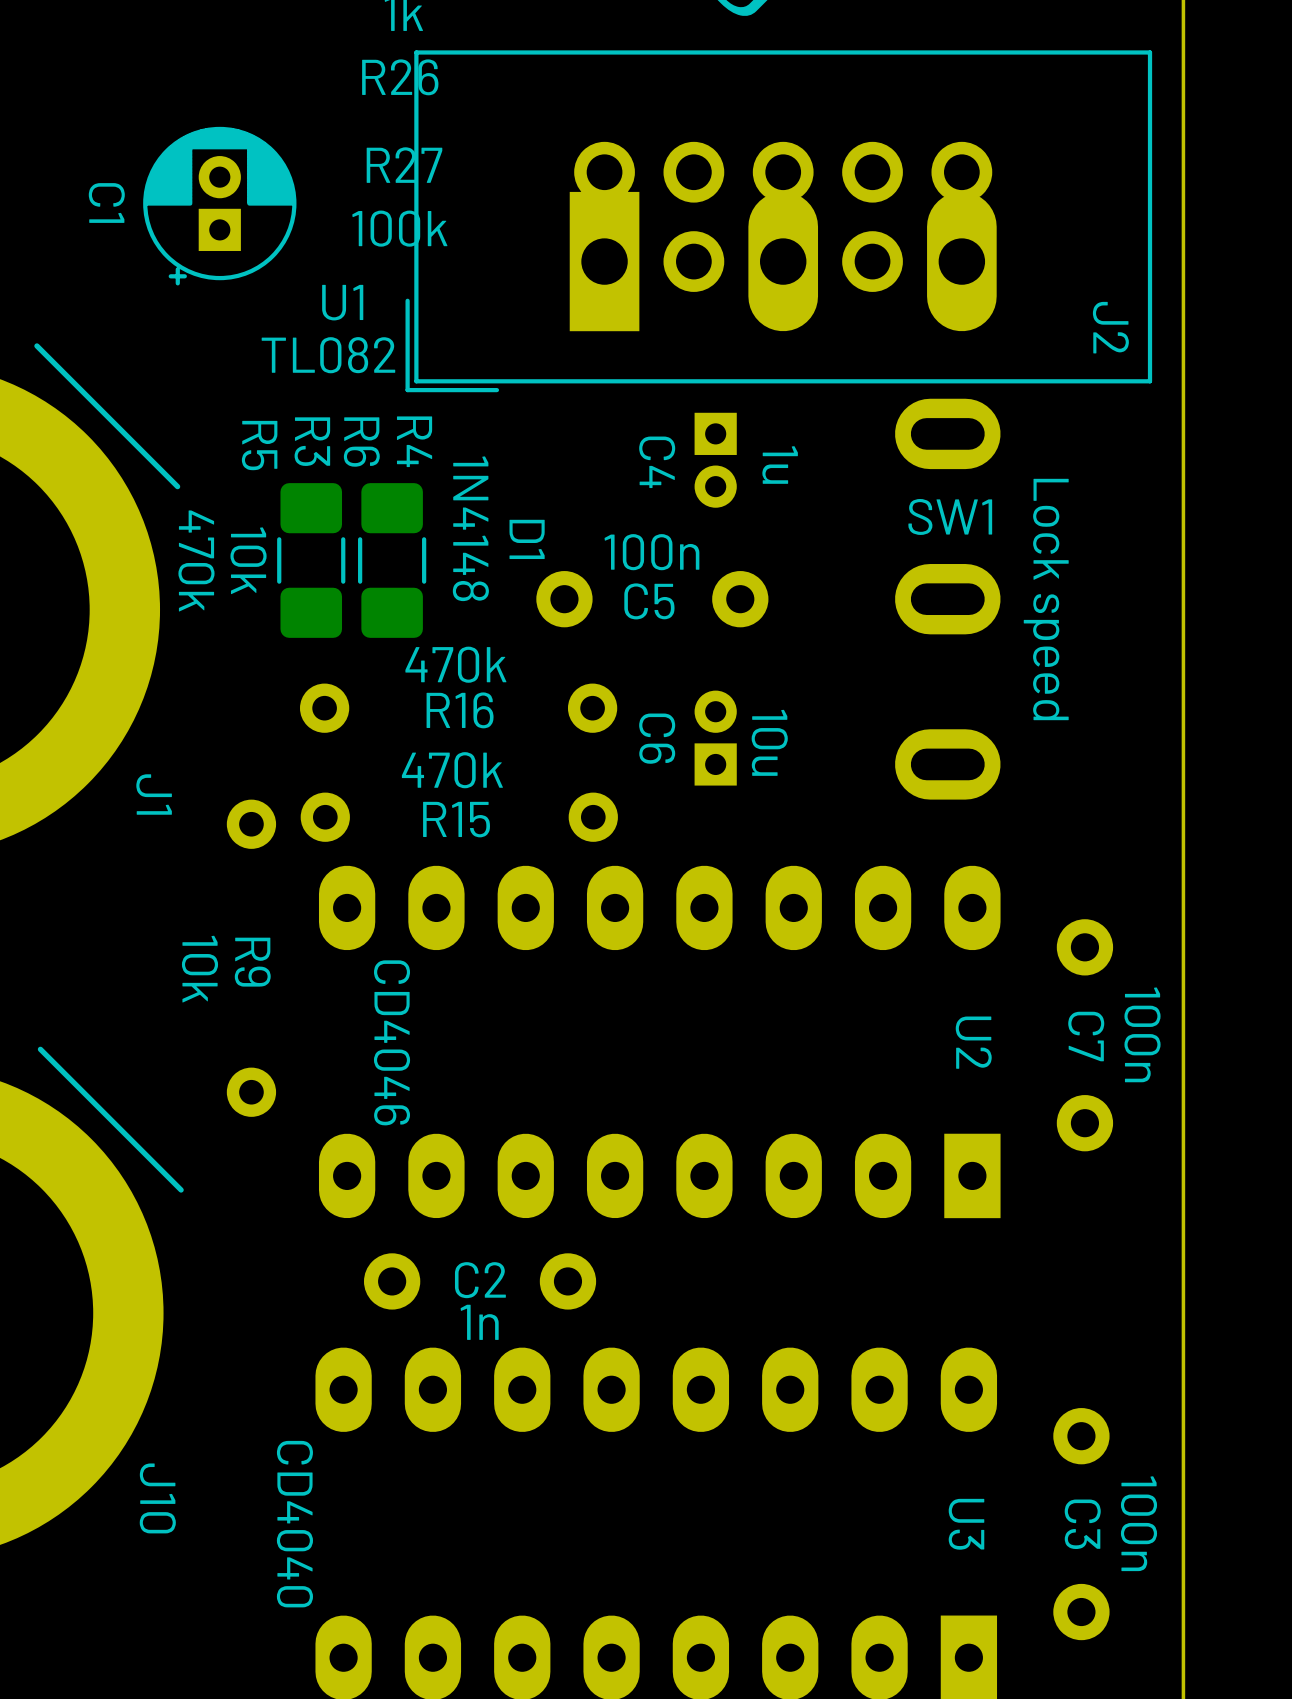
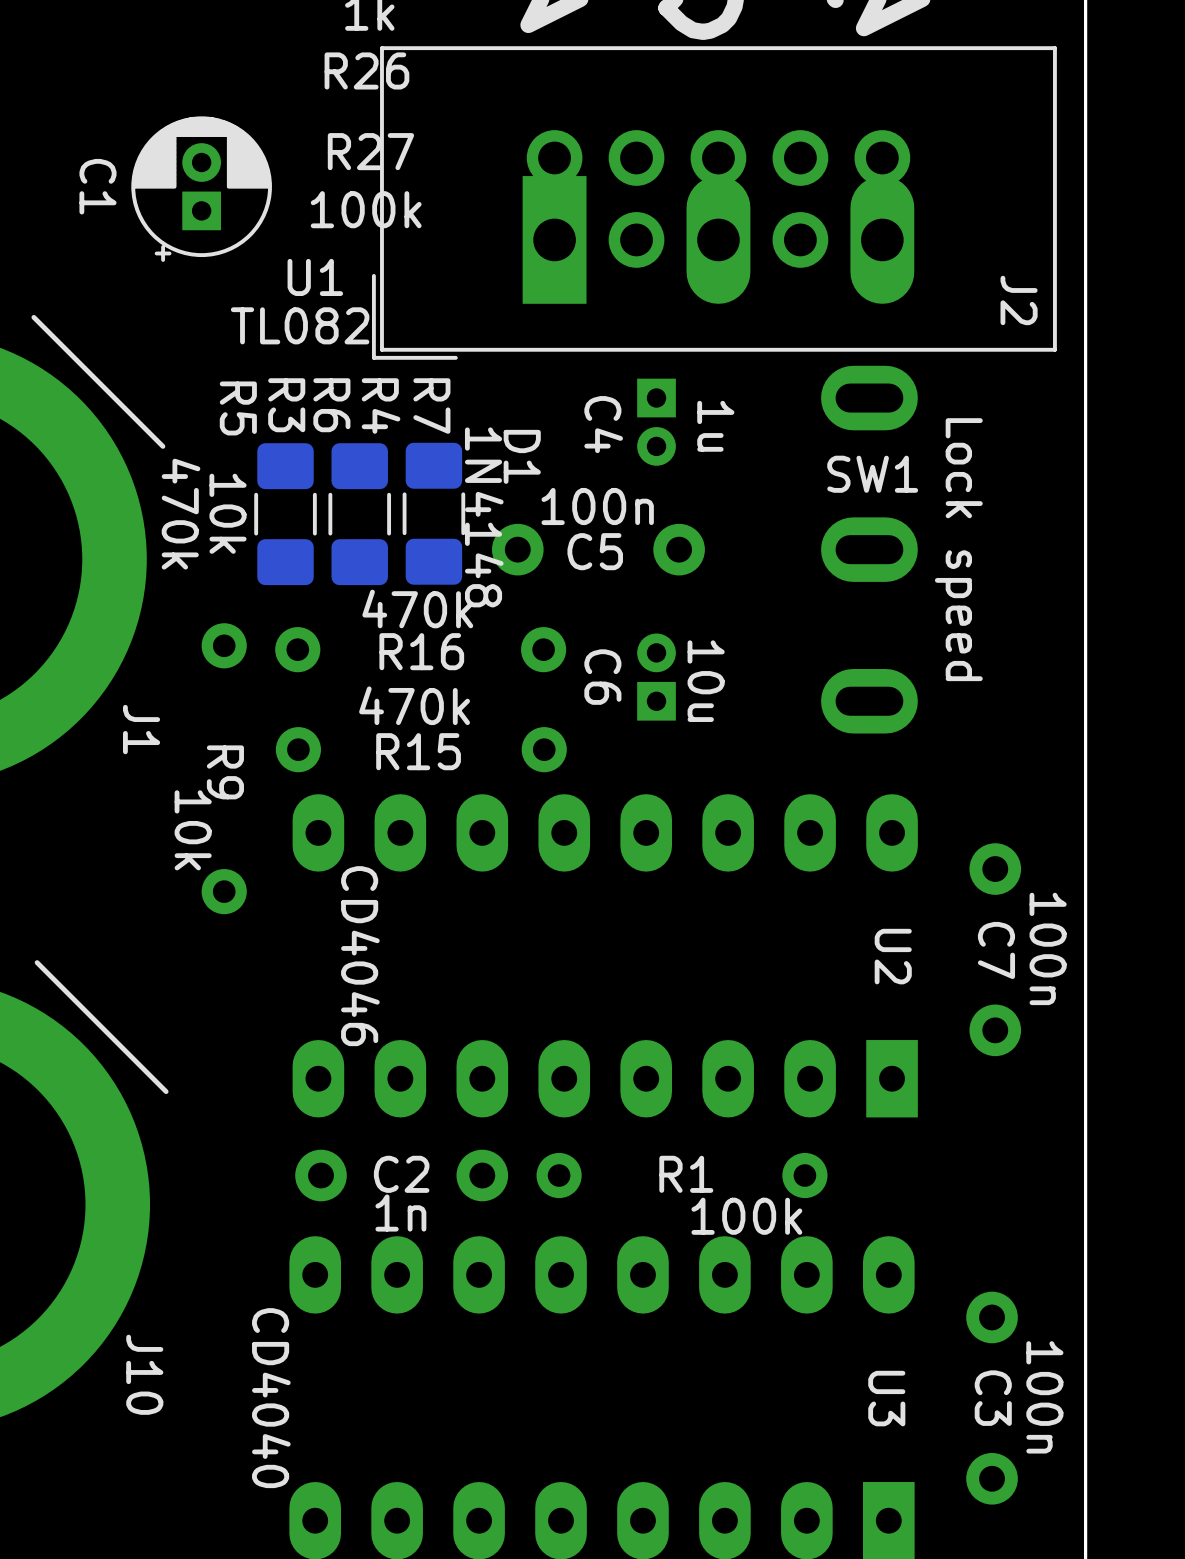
D1 value position: 1N4148 (470, 528) -> 1N4148 (484, 517)
D1 position: (498, 528) -> (502, 517)
D1 name position: D1 (527, 539) -> D1 (522, 456)
R7: none -> (433, 513)
R9 position: (251, 958) -> (224, 768)
R9 value position: 10k (199, 969) -> 10k (193, 830)
C2 position: (480, 1281) -> (401, 1175)
R1: none -> 100k (682, 1175)

